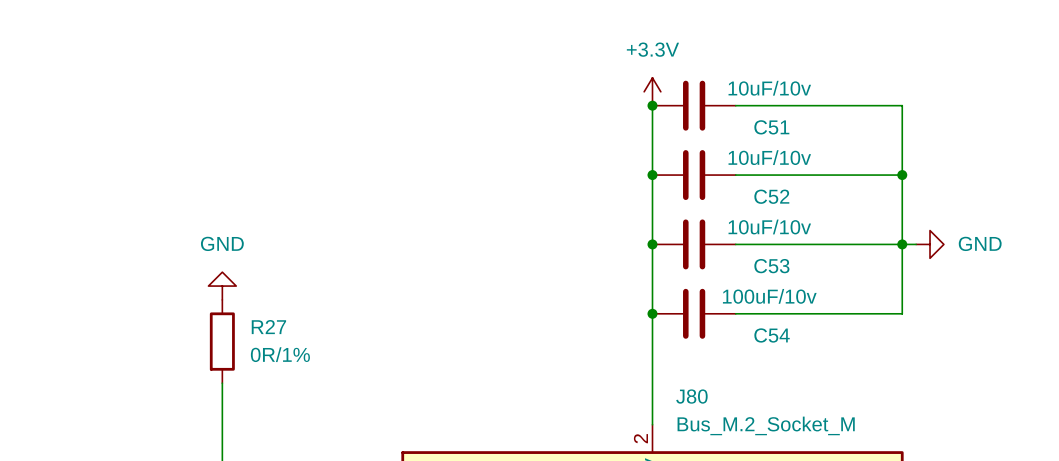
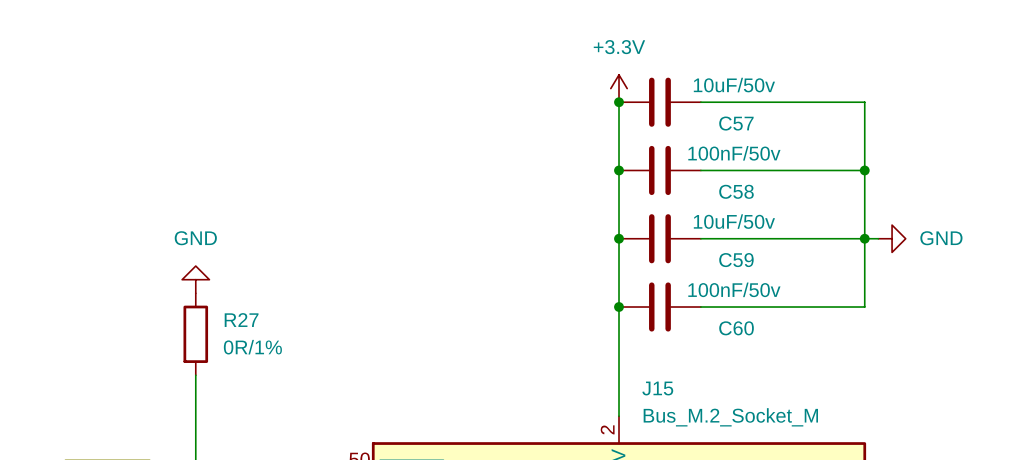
C51 value: 10uF/10v (769, 88) -> 10uF/50v (734, 85)
C51 name: C51 (771, 127) -> C57 (736, 123)
C52 value: 10uF/10v (769, 157) -> 100nF/50v (734, 153)
C52 name: C52 (771, 196) -> C58 (736, 191)
C53 value: 10uF/10v (769, 226) -> 10uF/50v (734, 221)
C53 name: C53 (771, 266) -> C59 (736, 260)
C54 value: 100uF/10v (769, 296) -> 100nF/50v (734, 289)
C54 name: C54 (772, 335) -> C60 (736, 328)
J80 name: J80 (691, 396) -> J15 (657, 388)

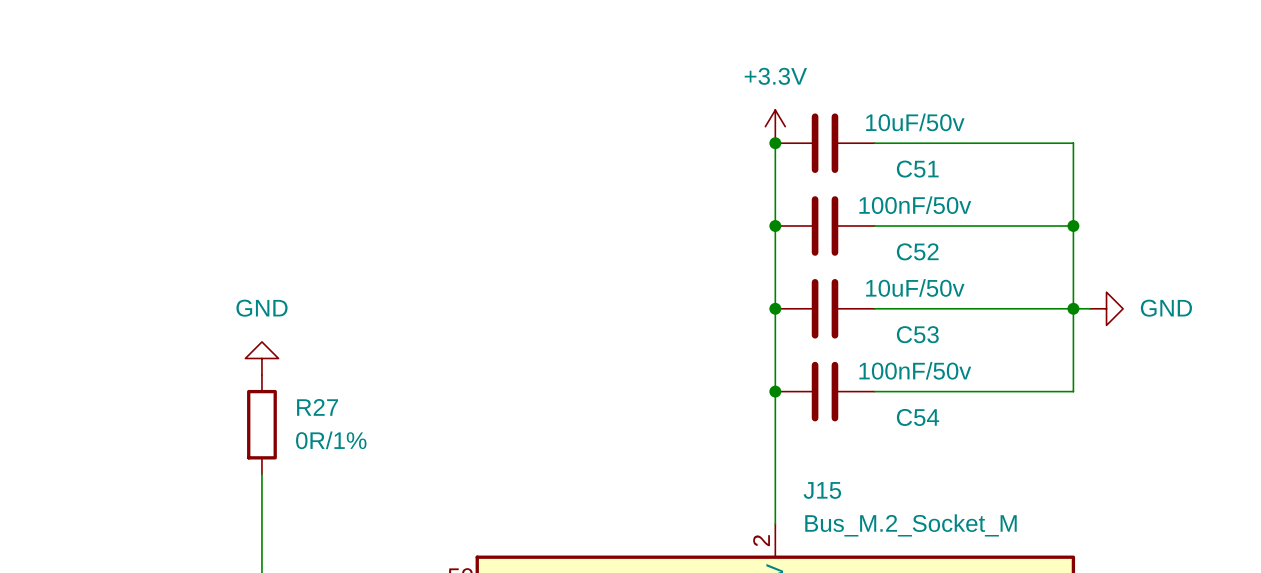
C57 name: C57 (736, 123) -> C51 (917, 169)
C58 name: C58 (736, 191) -> C52 (917, 251)
C59 name: C59 (736, 260) -> C53 (917, 334)
C60 name: C60 (736, 328) -> C54 (918, 417)

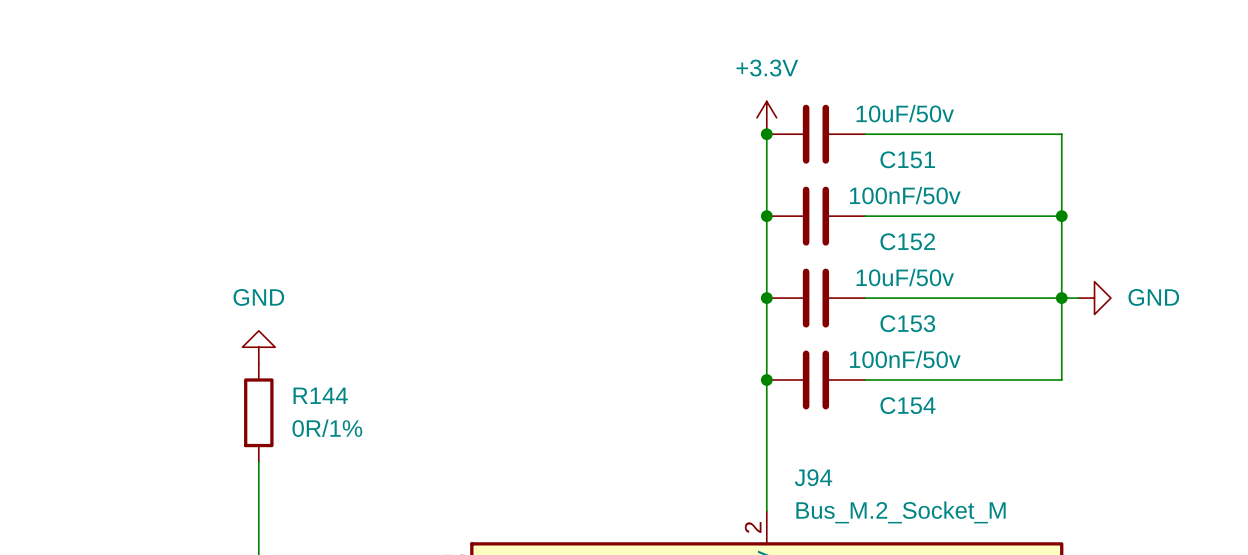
C51 name: C51 (917, 169) -> C151 (907, 159)
C52 name: C52 (917, 251) -> C152 (907, 241)
C53 name: C53 (917, 334) -> C153 (907, 323)
R27 name: R27 (317, 407) -> R144 (320, 395)
C54 name: C54 (918, 417) -> C154 (907, 405)
J15 name: J15 (822, 490) -> J94 (813, 477)

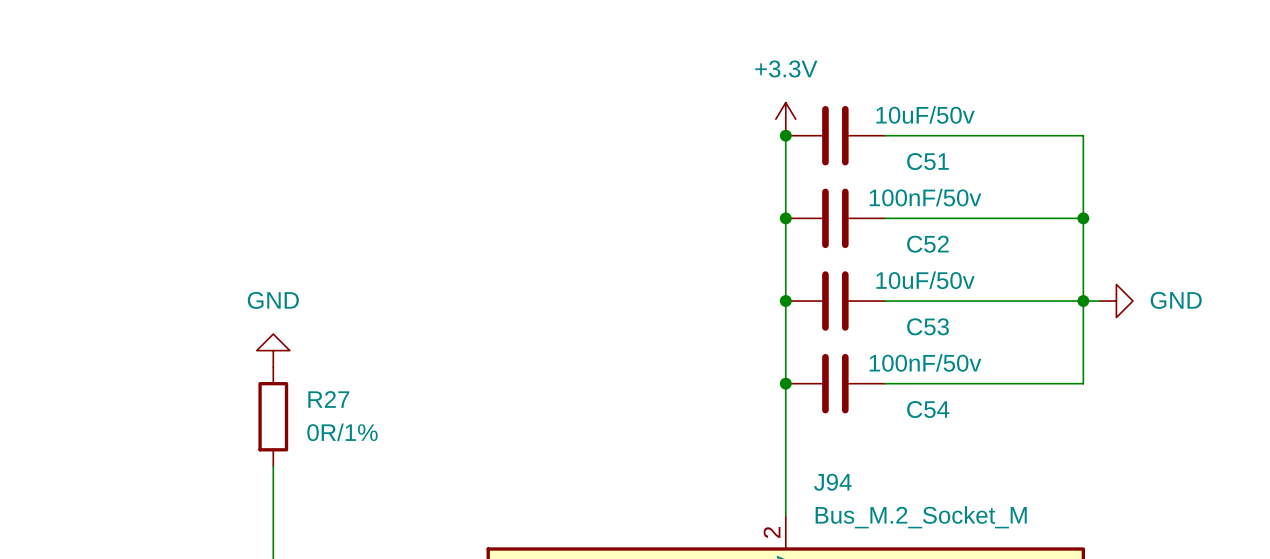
C151 name: C151 (907, 159) -> C51 (927, 161)
C152 name: C152 (907, 241) -> C52 (927, 244)
C153 name: C153 (907, 323) -> C53 (928, 326)
R144 name: R144 (320, 395) -> R27 (328, 399)
C154 name: C154 (907, 405) -> C54 (928, 409)

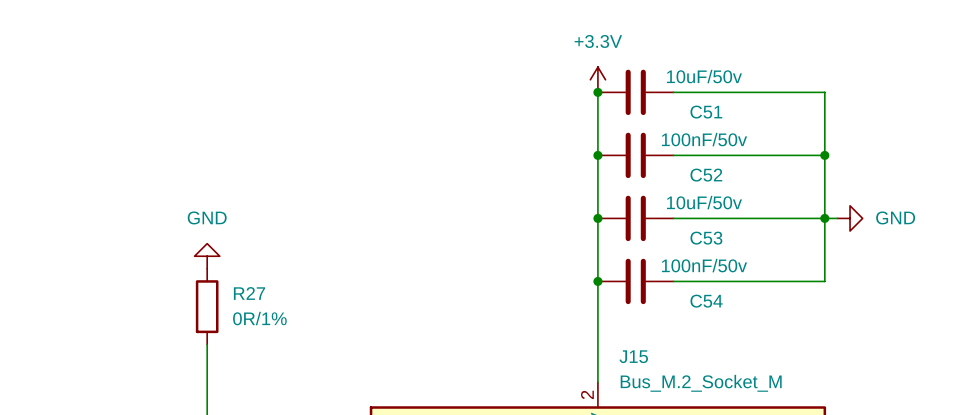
J94 name: J94 (832, 482) -> J15 (633, 356)

